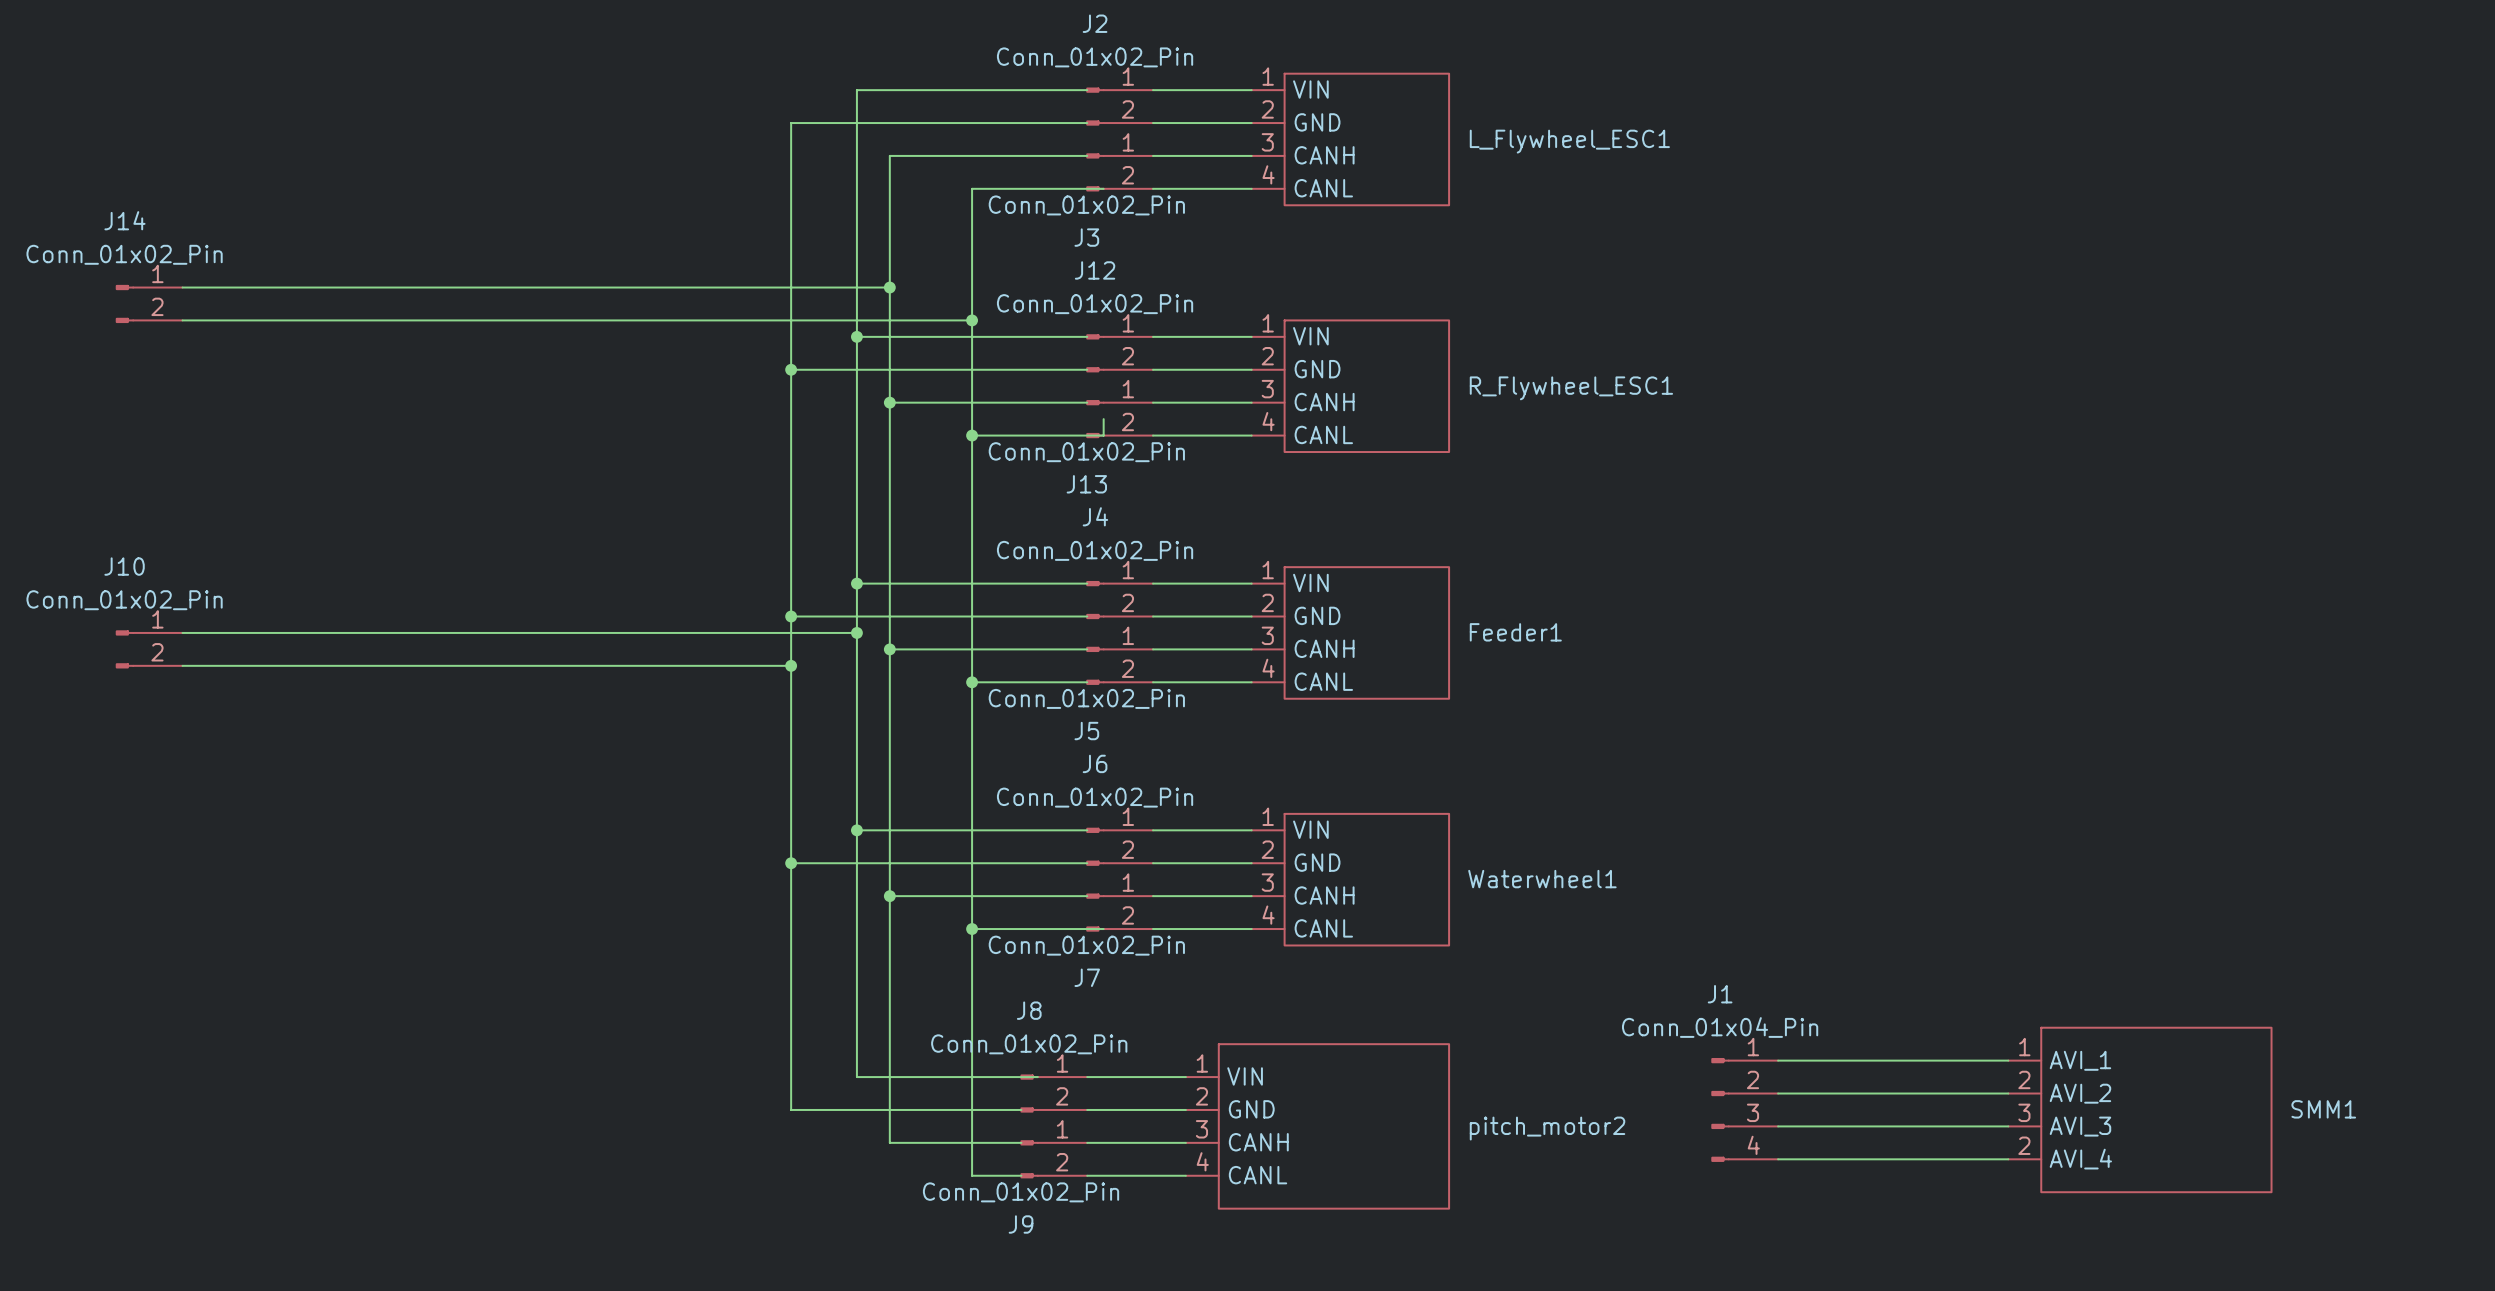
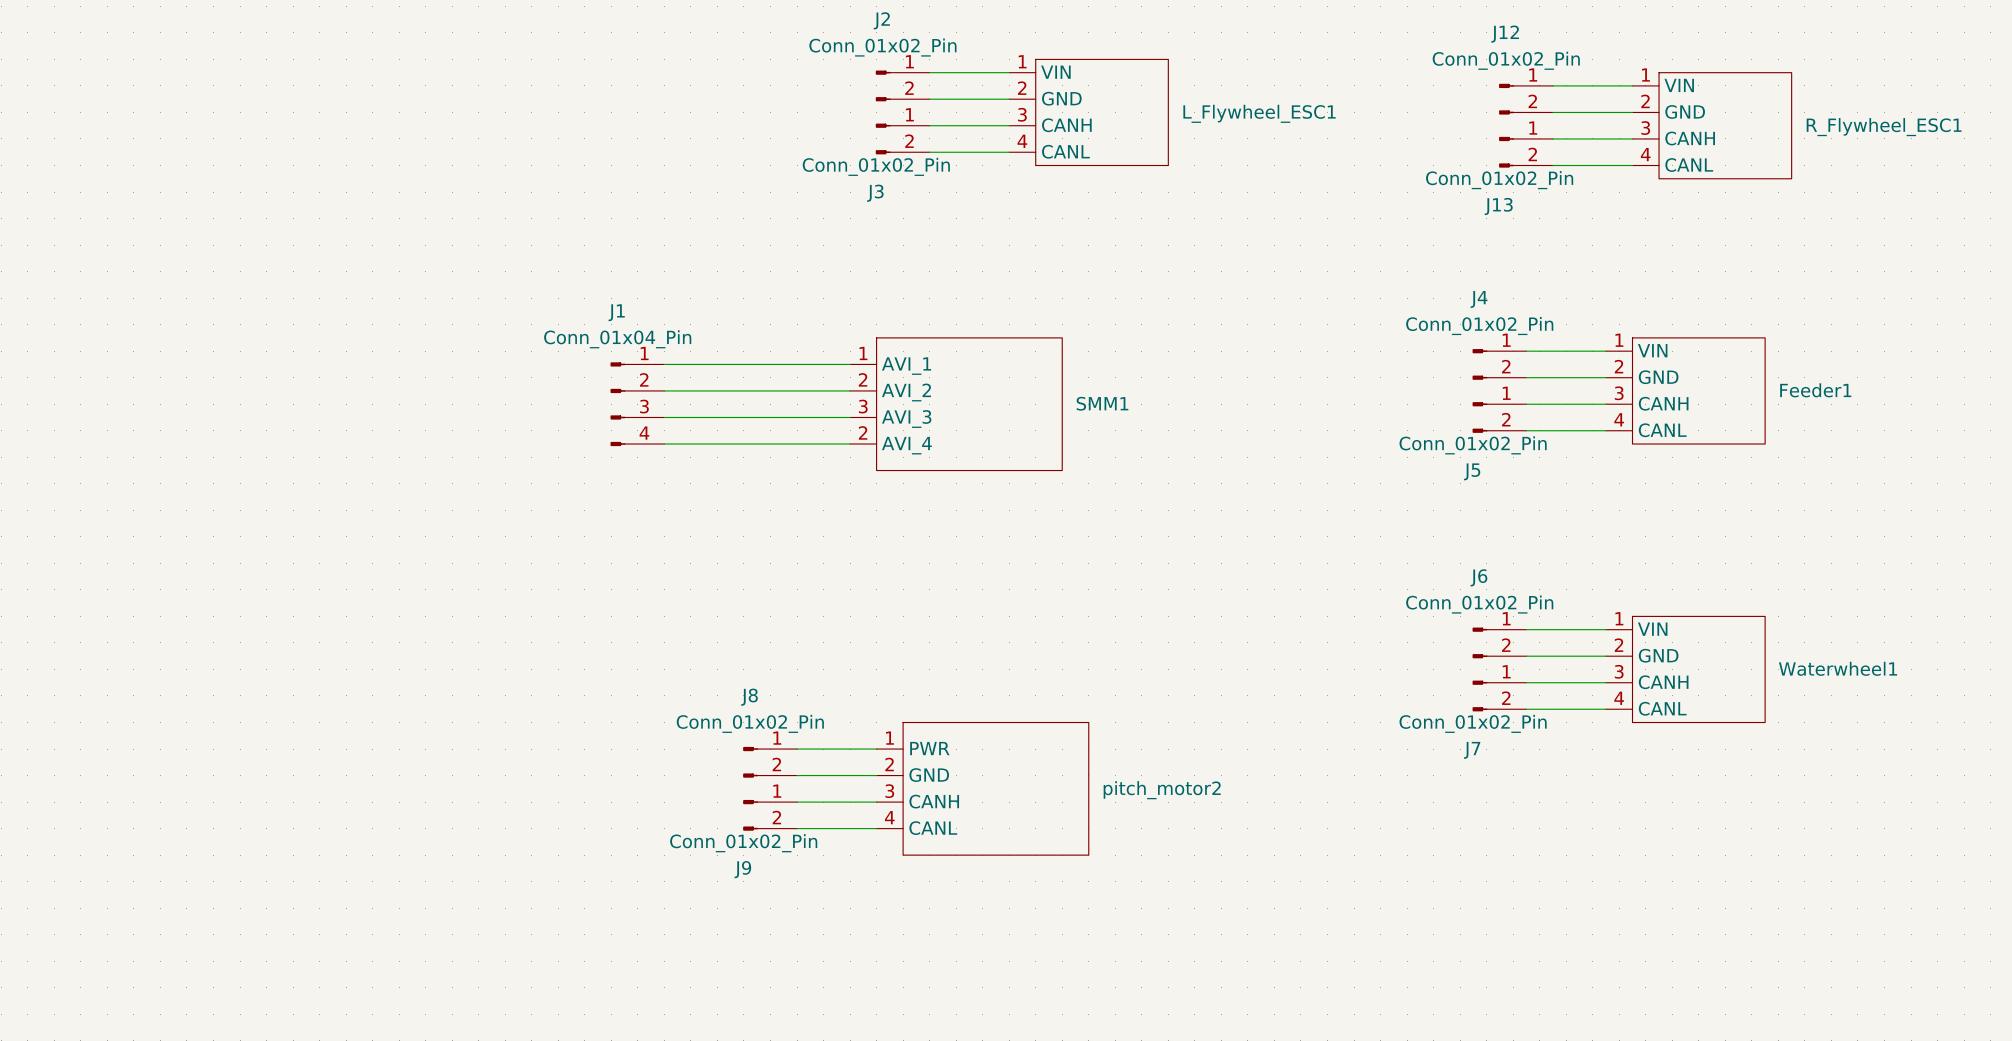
wire: (1087, 90) (856, 90) (856, 1077) (1037, 1077) -> none
wire: none -> (1552, 85) (1632, 85)
wire: (1087, 123) (791, 123) (791, 1109) (1021, 1109) -> none
wire: none -> (1552, 112) (1632, 112)
wire: (1087, 155) (889, 155) (889, 1142) (1021, 1142) -> none
wire: none -> (1552, 138) (1632, 138)
wire: (1103, 188) (972, 188) (972, 1175) (1021, 1175) -> none
wire: none -> (1552, 165) (1632, 165)
wire: (182, 287) (889, 287) -> none
junction: (889, 287) -> none
J14: Conn_01x02_Pin (149, 303) -> none
wire: (182, 320) (972, 320) -> none
junction: (972, 320) -> none
wire: (856, 336) (1087, 336) -> (664, 364) (850, 364)
junction: (856, 336) -> none
wire: (1153, 336) (1251, 336) -> none
J12 position: (1119, 353) -> (1526, 99)
wire: (791, 369) (1087, 369) -> none
junction: (791, 369) -> none
wire: (1153, 369) (1251, 369) -> none
R_Flywheel_ESC1 position: (1350, 386) -> (1712, 125)
wire: (889, 402) (1087, 402) -> none
junction: (889, 402) -> none
wire: (1153, 402) (1251, 402) -> none
wire: (1103, 419) (1103, 435) (972, 435) -> none
J13 position: (1119, 419) -> (1526, 152)
junction: (972, 435) -> none
wire: (1153, 435) (1251, 435) -> none
wire: none -> (1526, 351) (1605, 351)
wire: none -> (1526, 377) (1605, 377)
wire: none -> (664, 390) (850, 390)
wire: none -> (1526, 404) (1605, 404)
wire: none -> (1526, 430) (1605, 430)
wire: (856, 583) (1087, 583) -> (664, 444) (850, 444)
junction: (856, 583) -> none
J4 position: (1119, 600) -> (1499, 364)
wire: (791, 616) (1087, 616) -> none
junction: (791, 616) -> none
wire: (1153, 616) (1251, 616) -> none
wire: (182, 632) (856, 632) -> none
junction: (856, 632) -> none
Feeder1 position: (1350, 632) -> (1685, 390)
J10: Conn_01x02_Pin (149, 649) -> none
wire: (889, 649) (1087, 649) -> none
junction: (889, 649) -> none
wire: (1153, 649) (1251, 649) -> none
wire: (182, 665) (791, 665) -> none
junction: (791, 665) -> none
J5 position: (1119, 665) -> (1499, 417)
wire: (972, 682) (1087, 682) -> none
junction: (972, 682) -> none
wire: (1153, 682) (1251, 682) -> none
wire: none -> (1526, 629) (1605, 629)
wire: none -> (1526, 656) (1605, 656)
wire: (856, 830) (1087, 830) -> (664, 417) (850, 417)
junction: (856, 830) -> none
wire: (1153, 830) (1251, 830) -> none
J6 position: (1119, 846) -> (1499, 642)
wire: none -> (1526, 682) (1605, 682)
wire: (791, 863) (1087, 863) -> none
junction: (791, 863) -> none
wire: (1153, 863) (1251, 863) -> none
Waterwheel1 position: (1350, 879) -> (1685, 669)
wire: none -> (1526, 709) (1605, 709)
wire: (889, 896) (1087, 896) -> none
junction: (889, 896) -> none
J7 position: (1119, 912) -> (1499, 695)
junction: (972, 929) -> none
wire: (1153, 929) (1251, 929) -> none
wire: (1778, 1060) (2008, 1060) -> none
pitch_motor2 pin name: VIN (1245, 1076) -> PWR (929, 748)
wire: (1087, 1077) (1185, 1077) -> (797, 775) (876, 775)
J8 position: (1053, 1093) -> (770, 762)
wire: (1778, 1093) (2008, 1093) -> none
wire: (1087, 1109) (1185, 1109) -> (797, 802) (876, 802)
J1 position: (1744, 1109) -> (637, 404)
SMM1 position: (2139, 1109) -> (956, 404)
pitch_motor2 position: (1317, 1126) -> (982, 788)
wire: (1778, 1126) (2008, 1126) -> none
wire: (1087, 1142) (1185, 1142) -> (797, 828) (876, 828)
J9 position: (1053, 1159) -> (770, 815)
wire: (1778, 1159) (2008, 1159) -> none
wire: (1087, 1175) (1185, 1175) -> none

